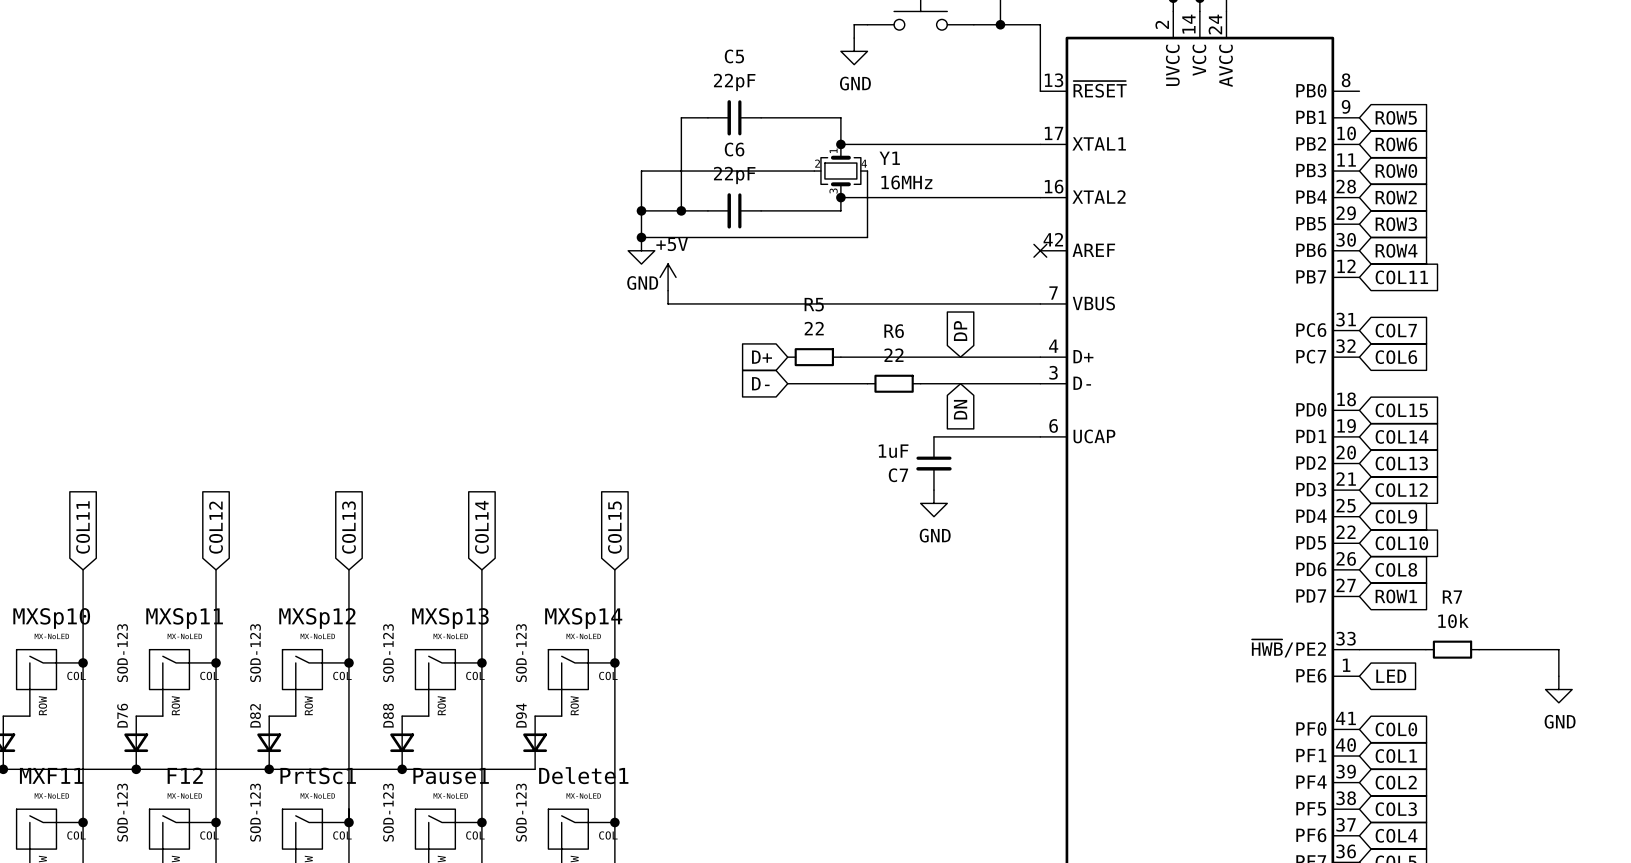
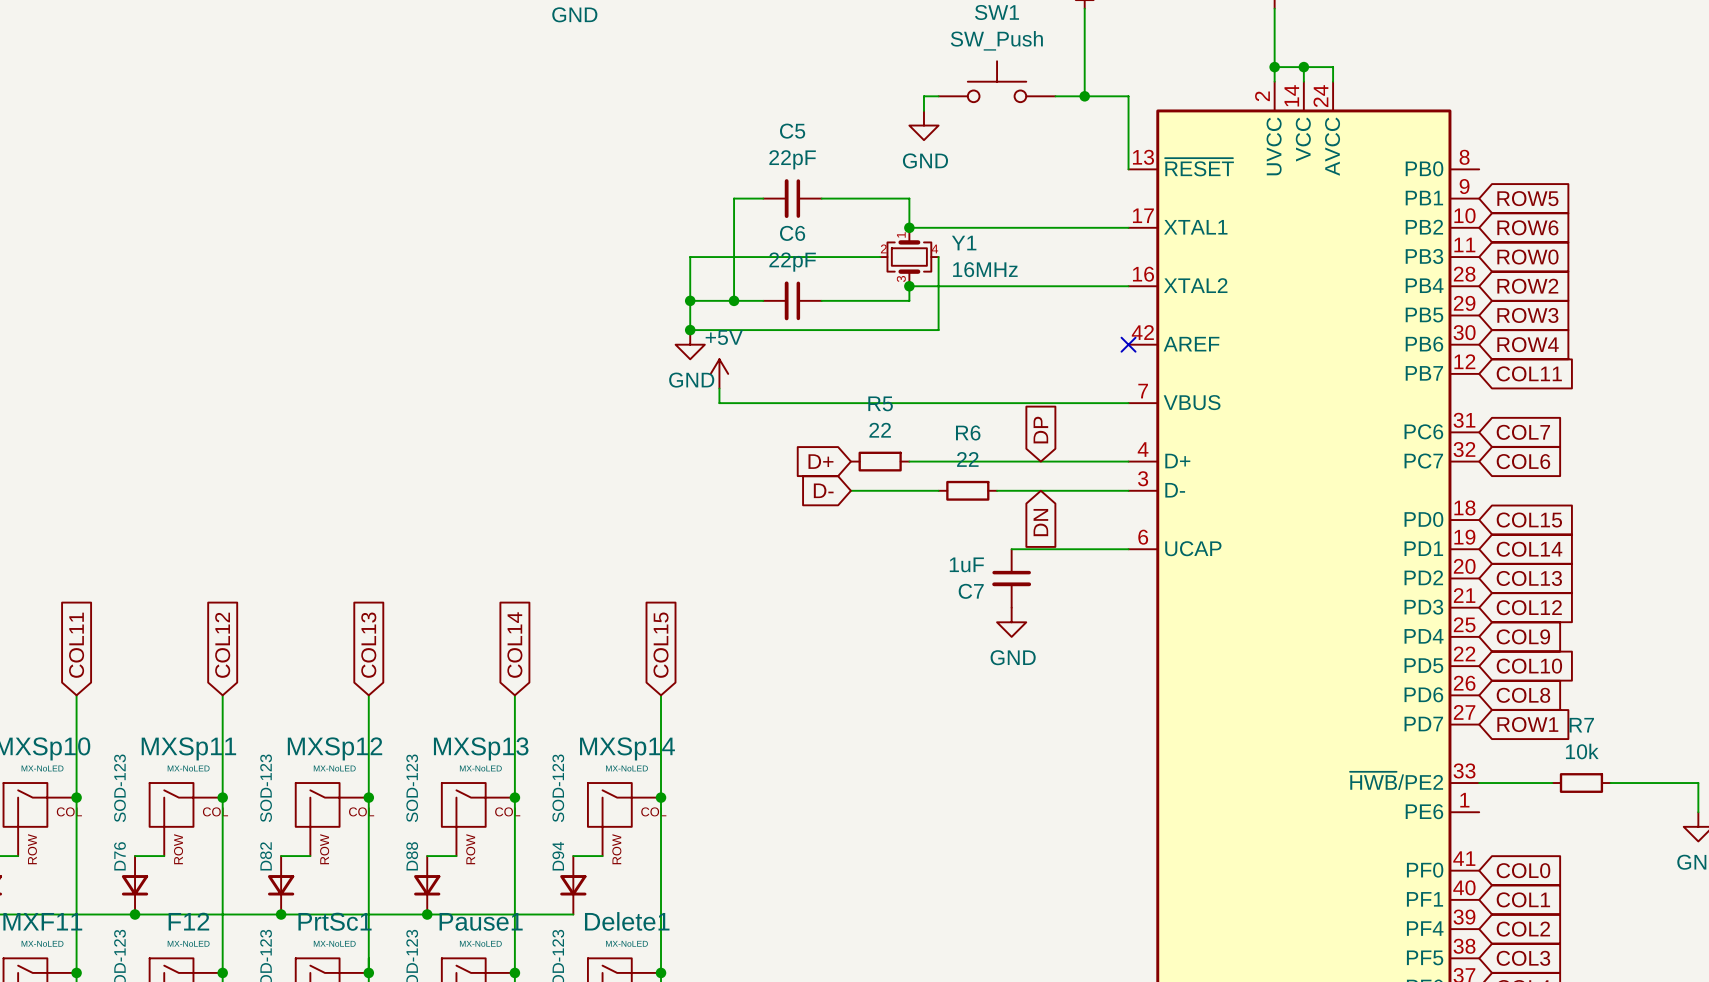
global label: LED (1391, 676) -> none

